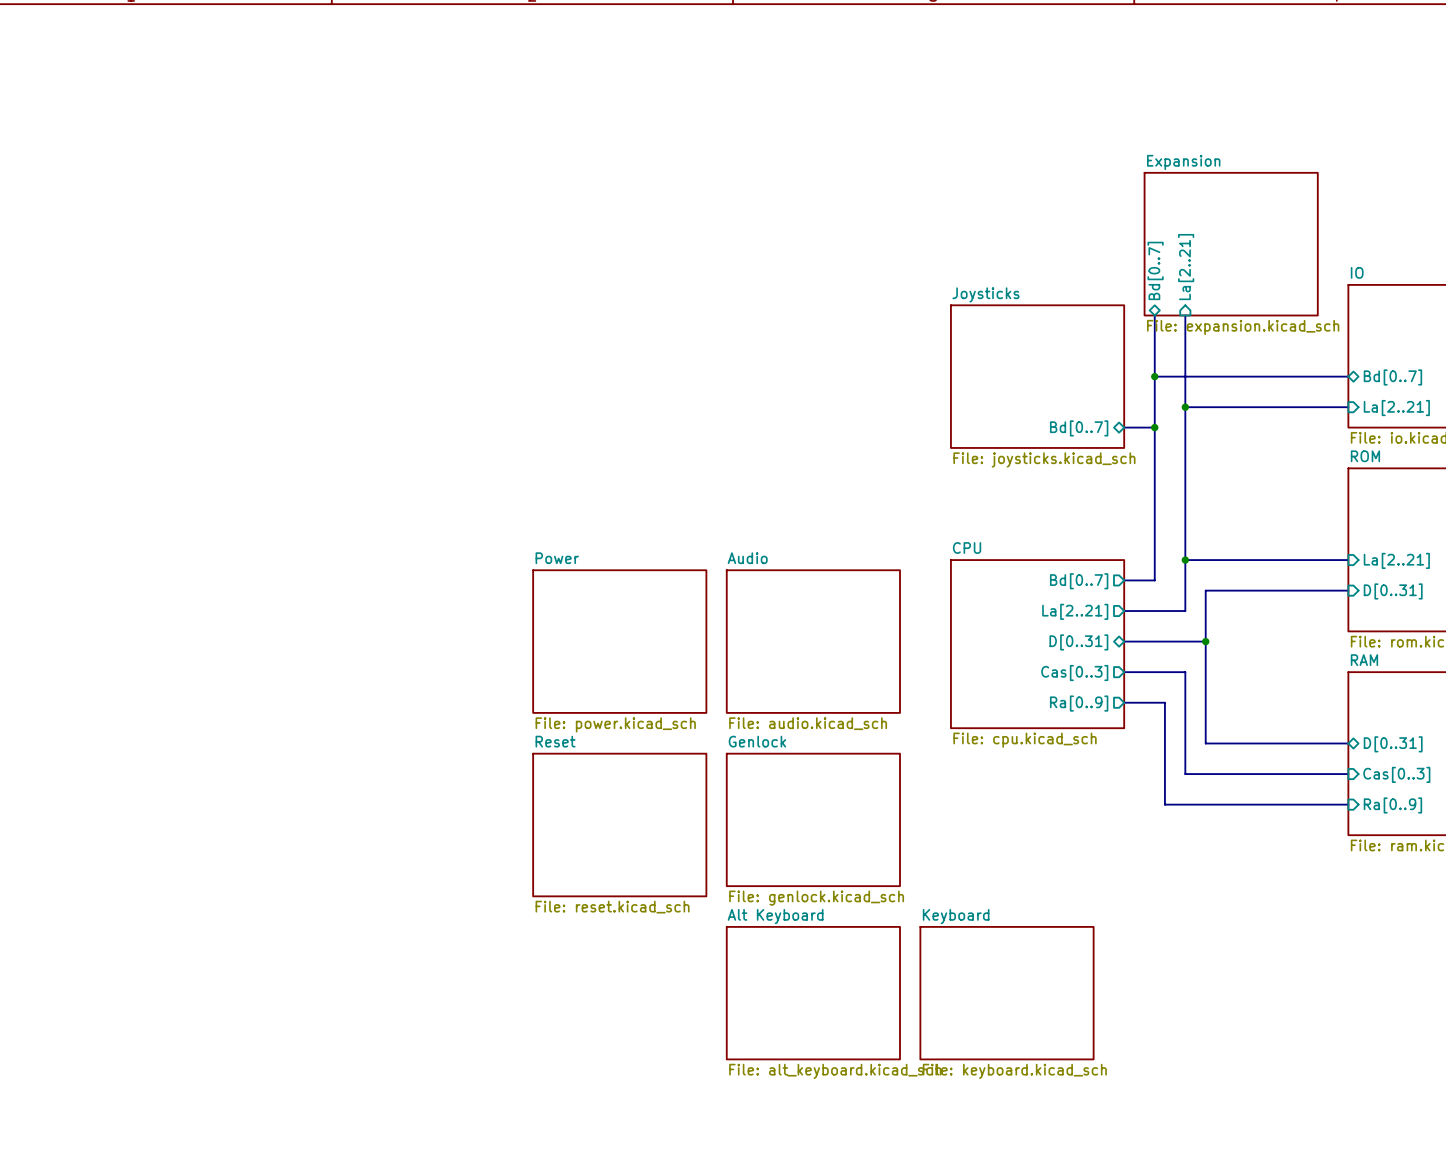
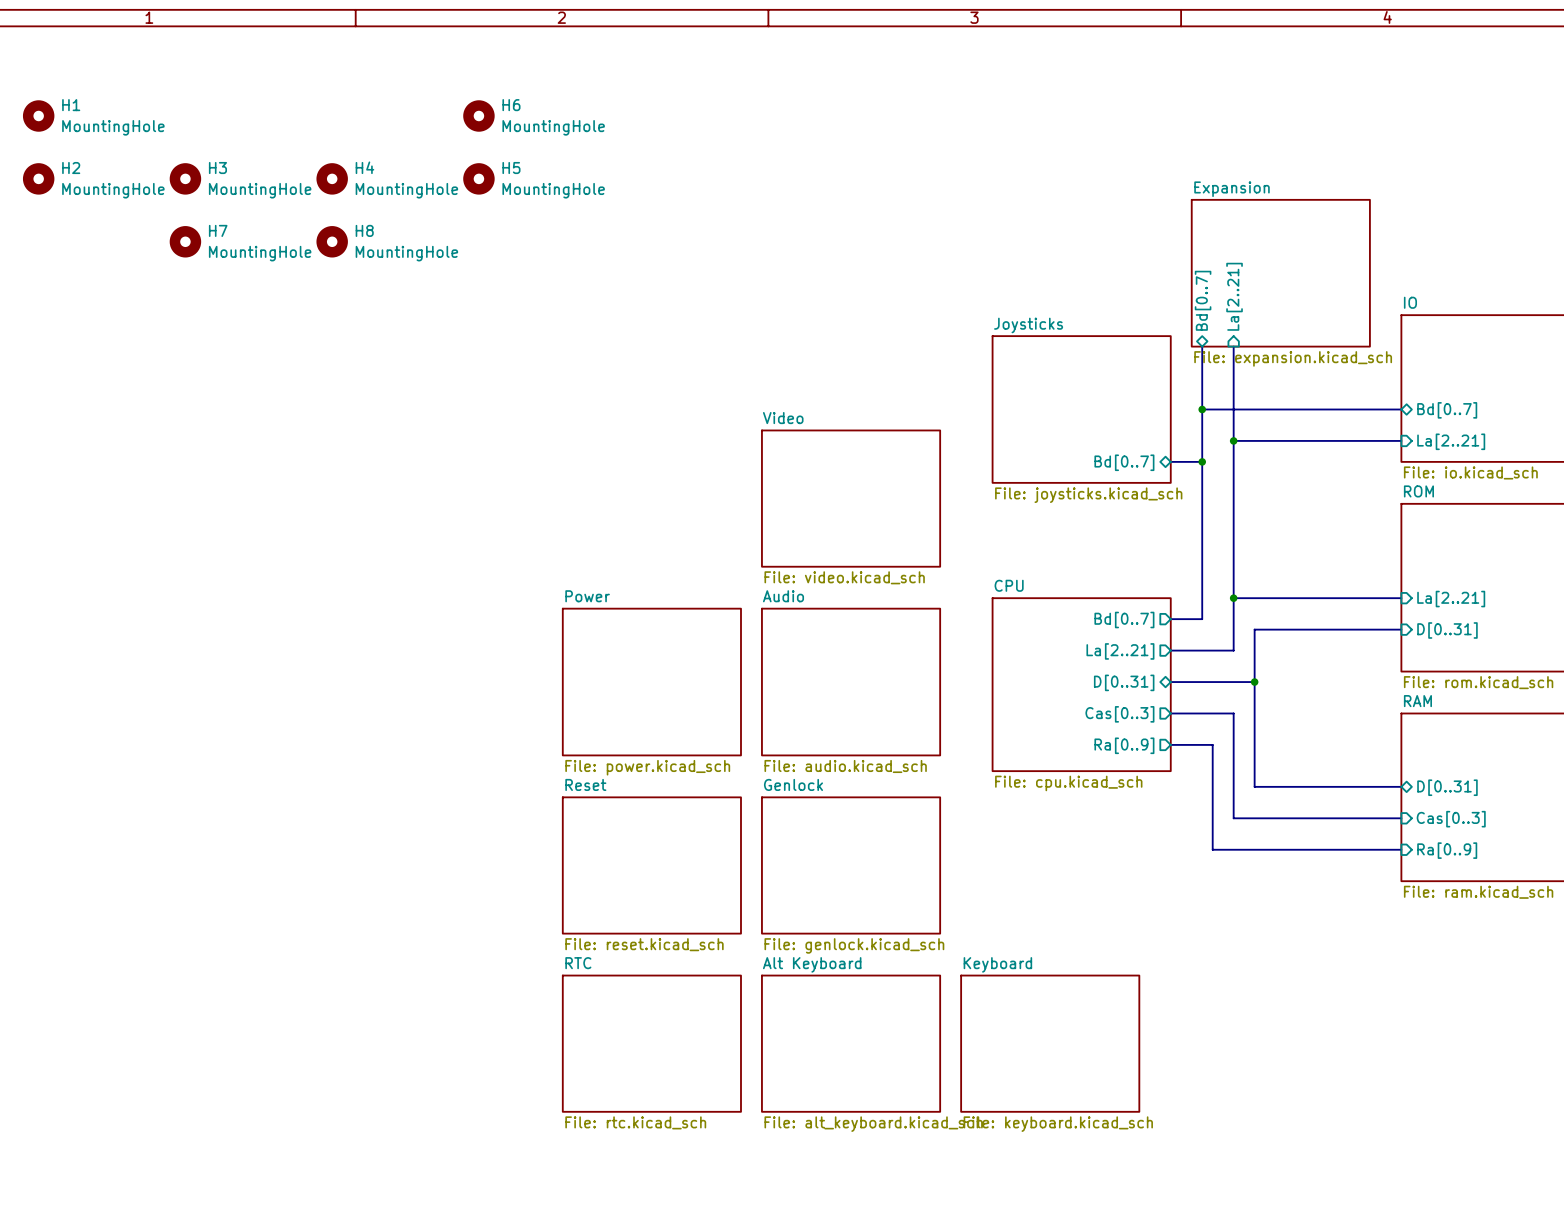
H1: none -> MountingHole (38, 115)
H6: none -> MountingHole (478, 115)
H2: none -> MountingHole (38, 178)
H3: none -> MountingHole (185, 178)
H4: none -> MountingHole (332, 178)
H5: none -> MountingHole (478, 178)
H7: none -> MountingHole (185, 241)
H8: none -> MountingHole (332, 241)
sheet Video: none -> File: video.kicad_sch (851, 498)
sheet Reset shape: [532, 753, 707, 897] -> [562, 796, 742, 935]
sheet RTC: none -> File: rtc.kicad_sch (651, 1043)

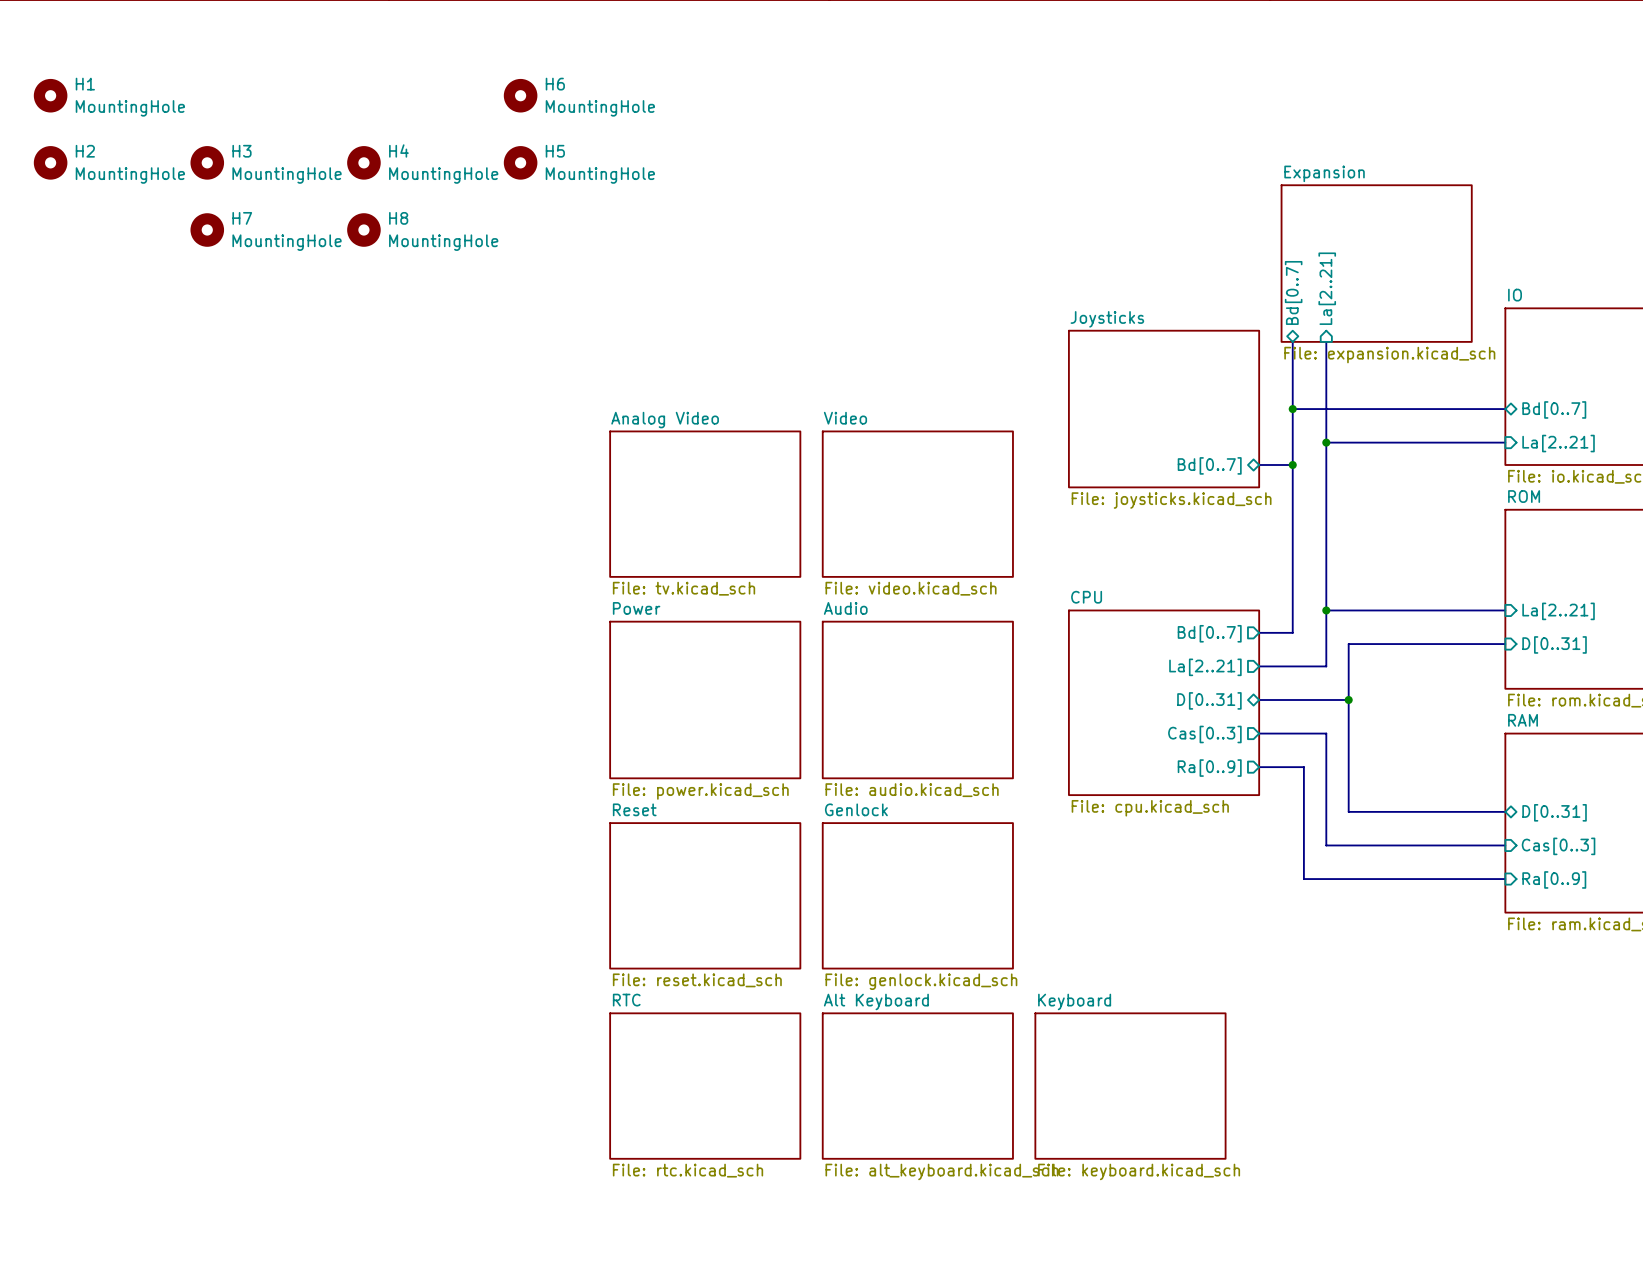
sheet Analog Video: none -> File: tv.kicad_sch (705, 504)

